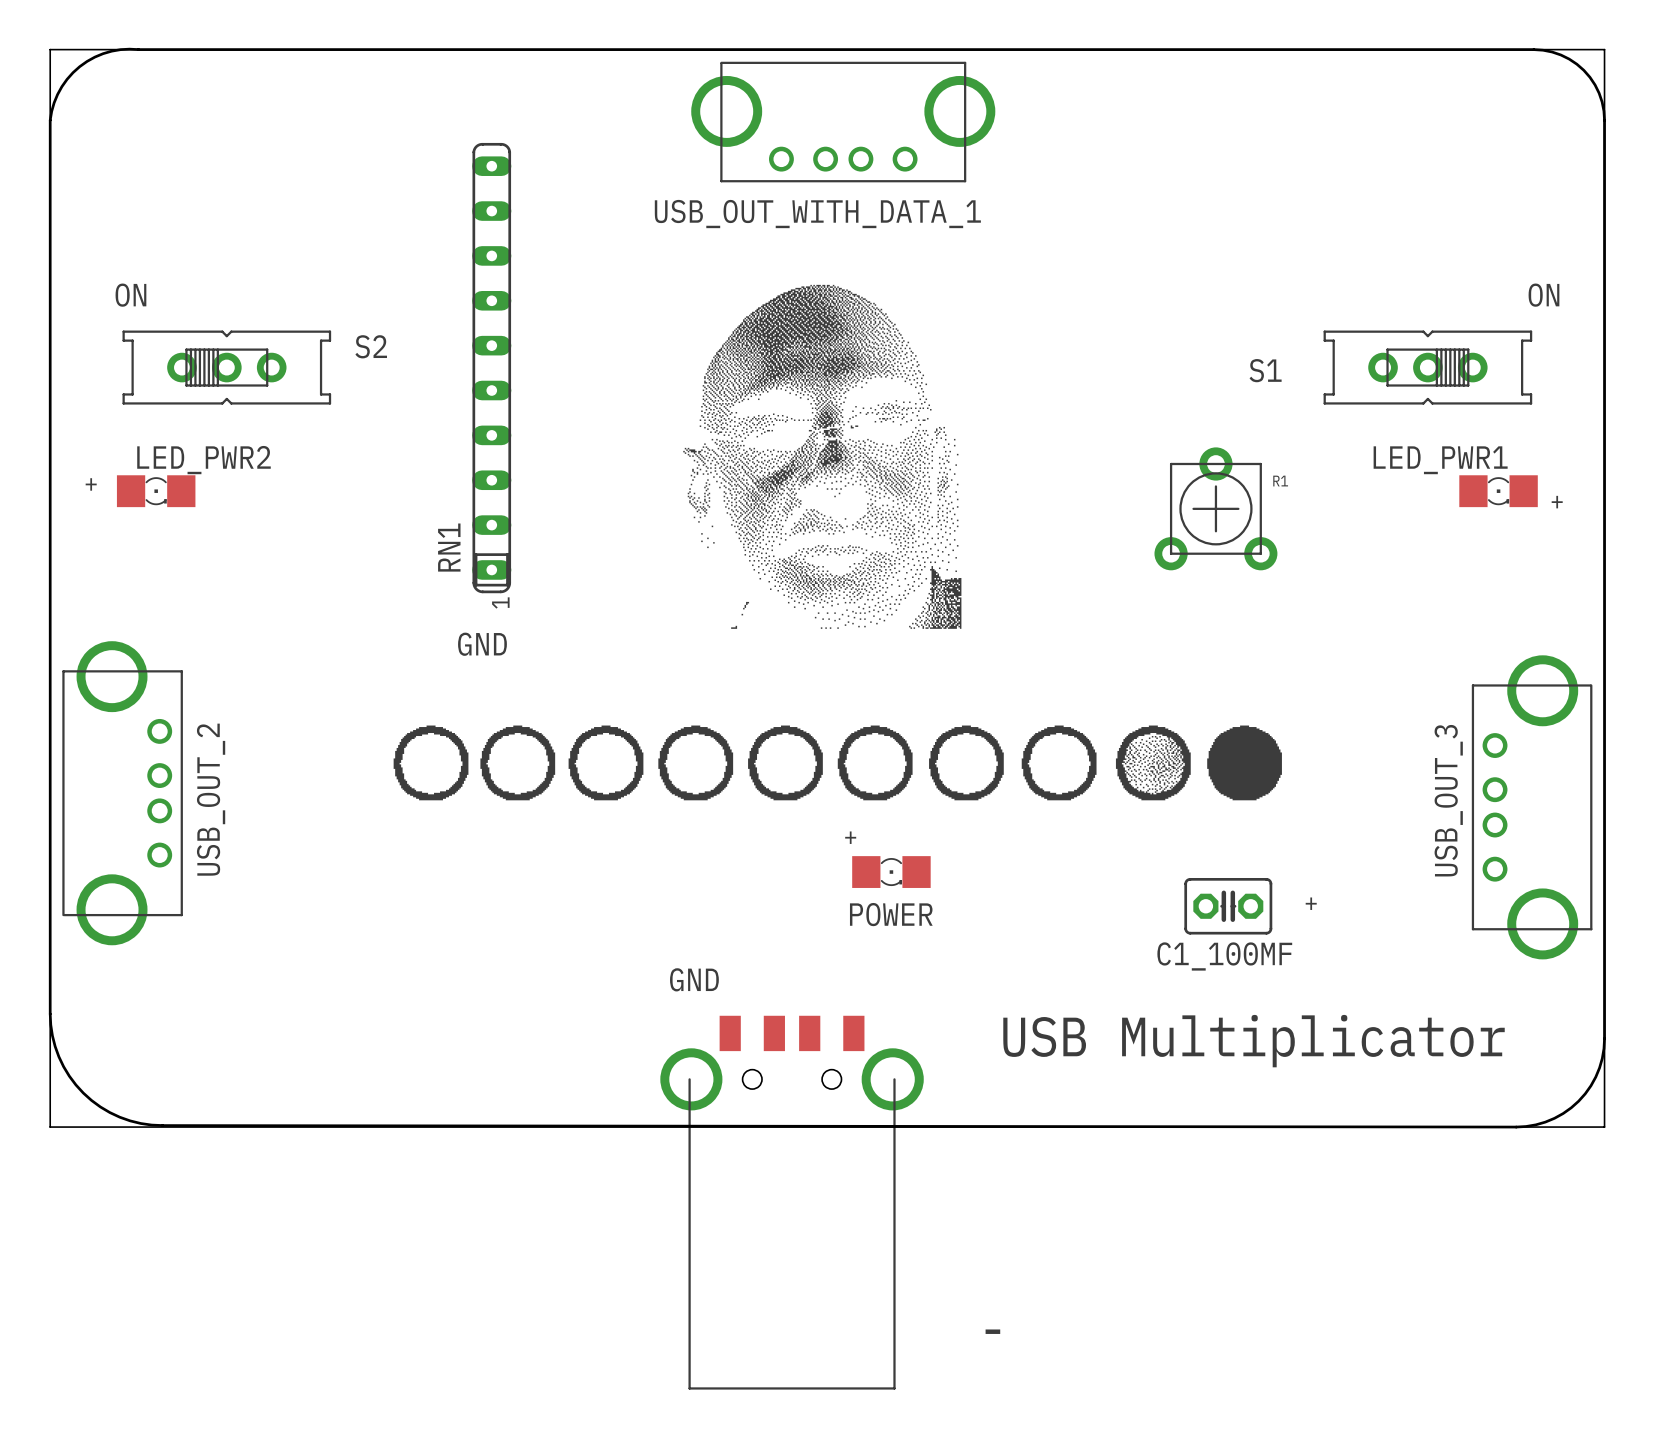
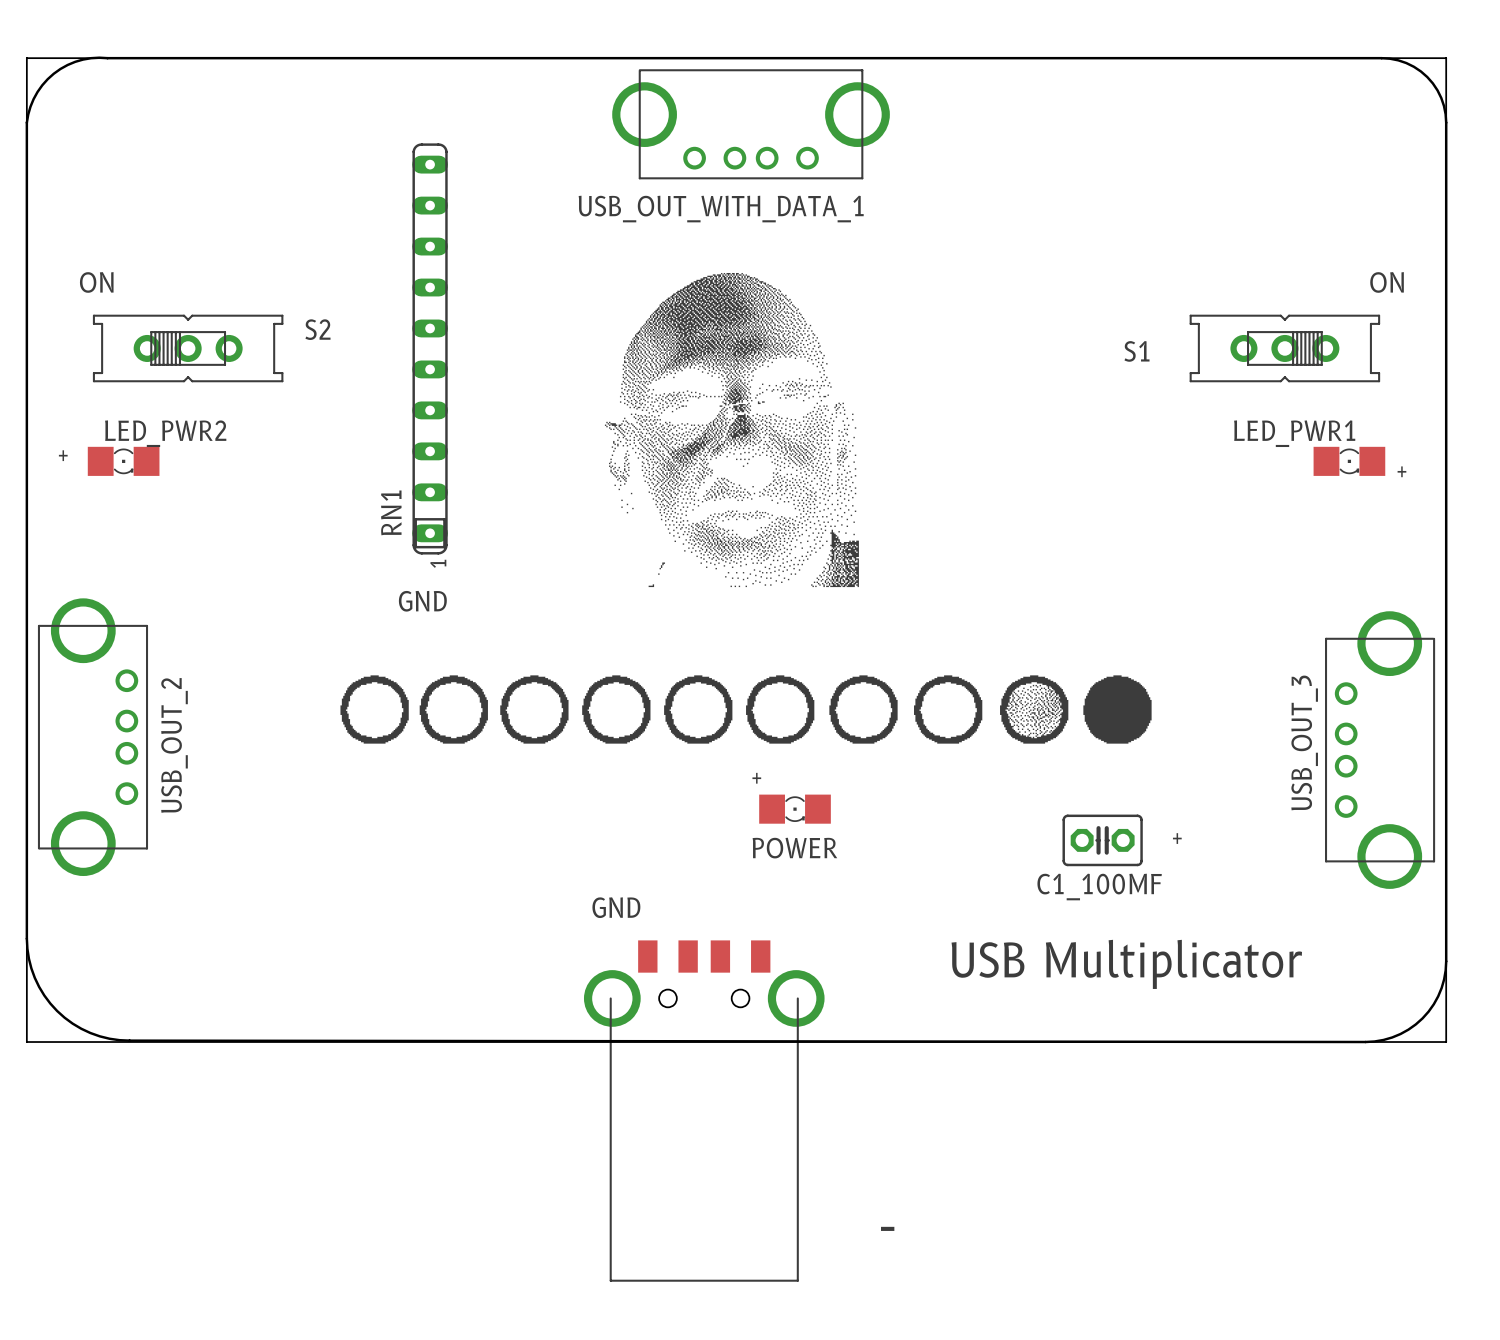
R1: (1215, 508) -> none

